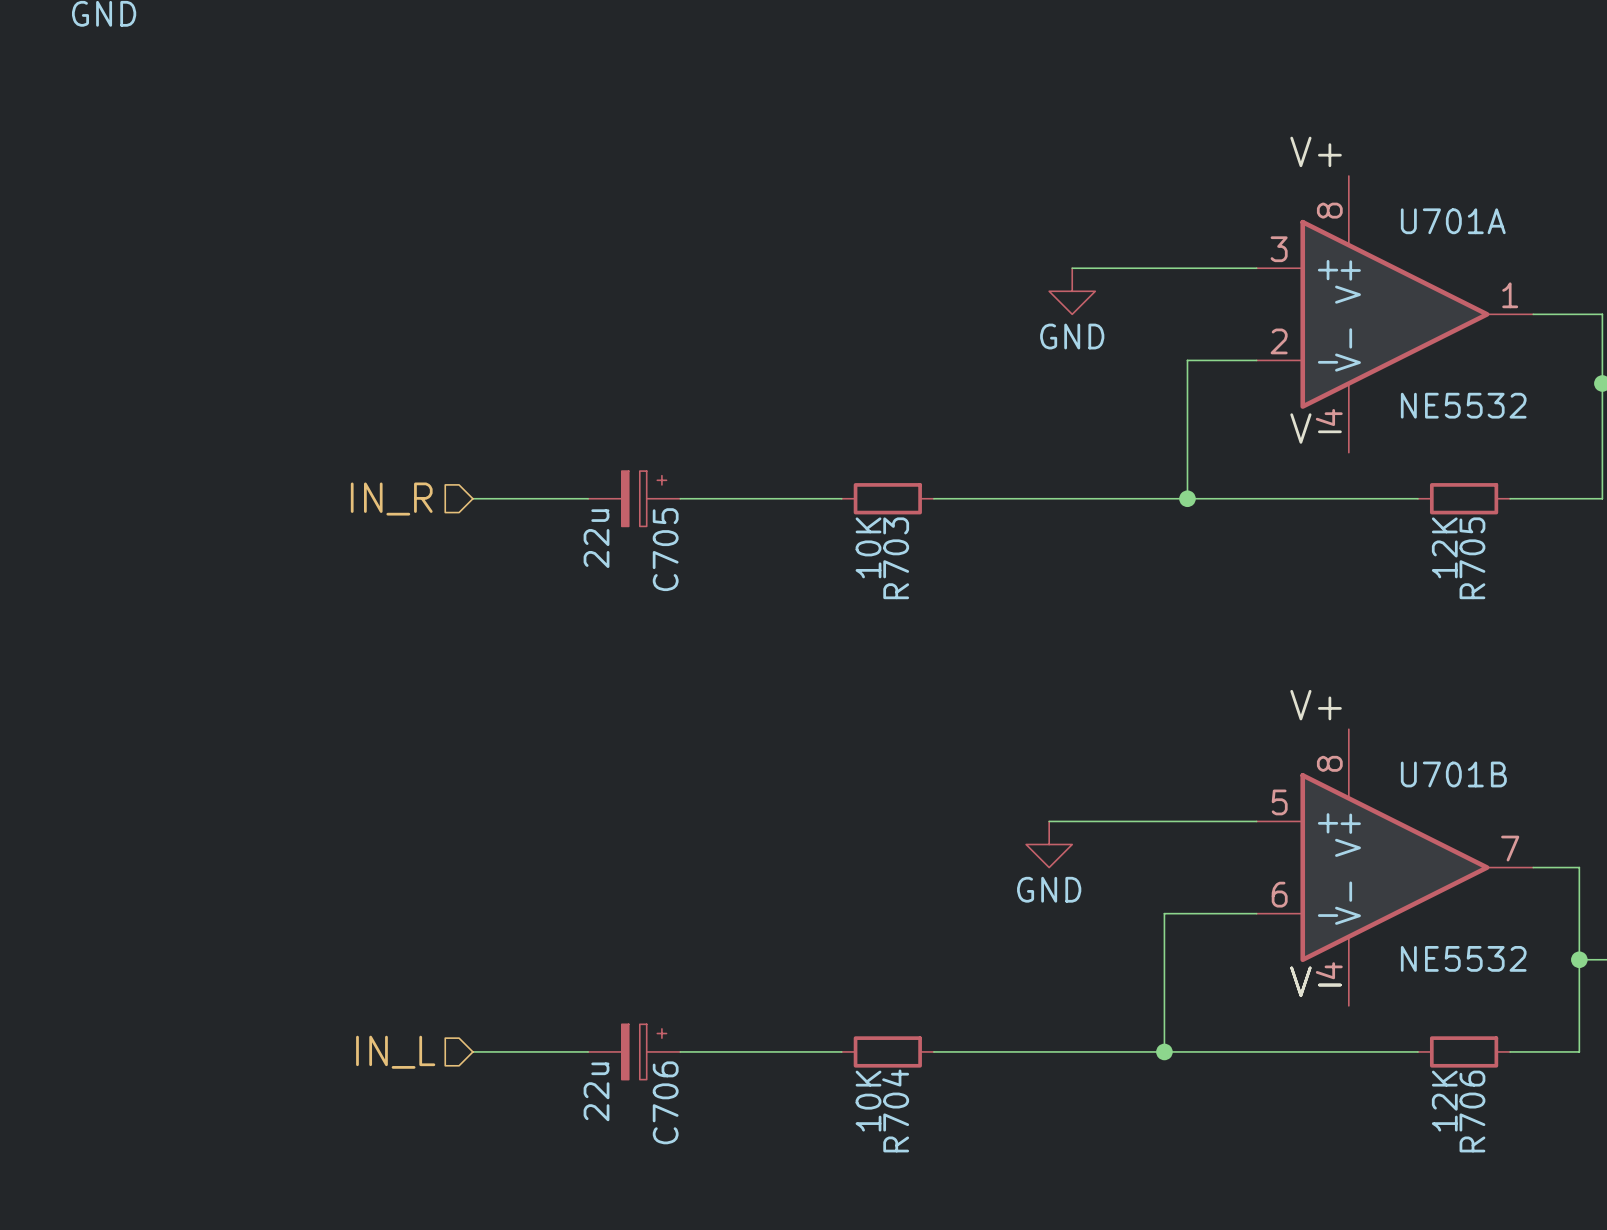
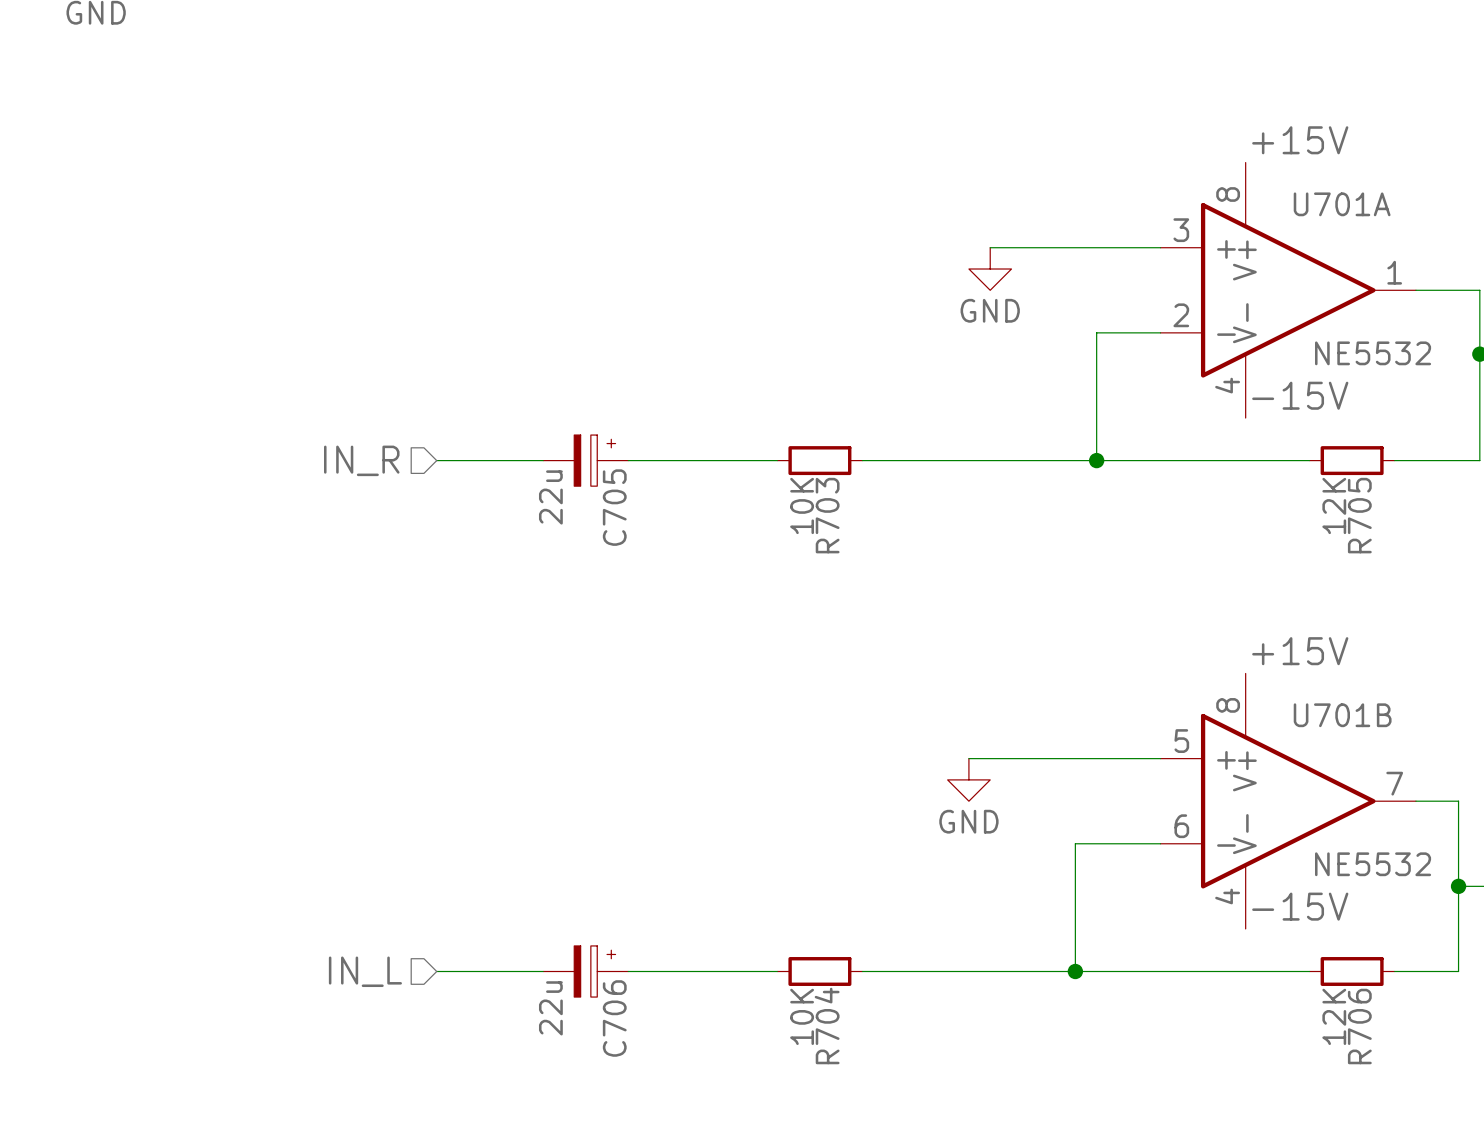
label: V+ (1316, 151) -> +15V (1300, 140)
U701A value position: NE5532 (1463, 405) -> NE5532 (1373, 353)
label: V- (1316, 428) -> -15V (1300, 395)
label: V+ (1316, 705) -> +15V (1300, 651)
U701B value position: NE5532 (1463, 958) -> NE5532 (1373, 864)
label: V- (1316, 981) -> -15V (1300, 906)

